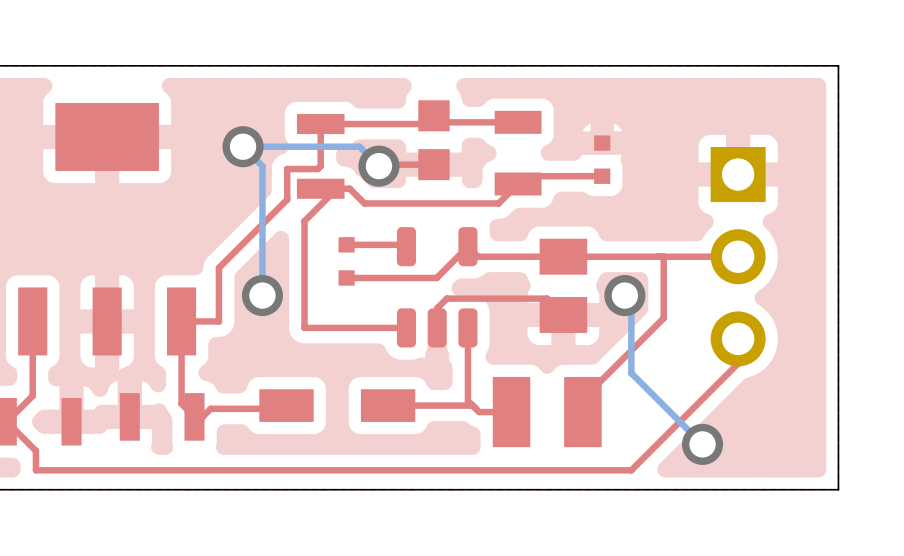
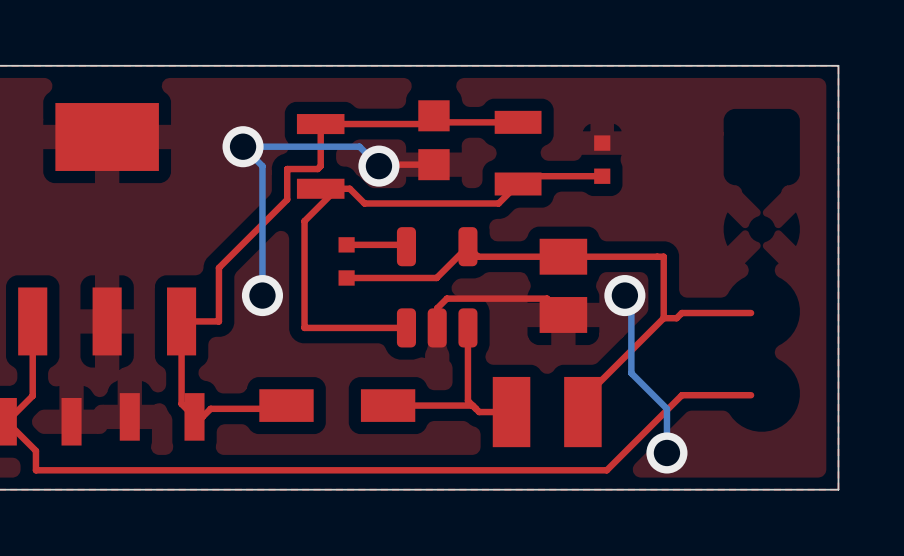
top track: (728, 247) (738, 256) (663, 256) -> none
part: (738, 256) -> none
top track: none -> (751, 313) (681, 313) (676, 318) (663, 318)
top track: (738, 338) (738, 363) (631, 470) (606, 470) -> (751, 395) (681, 395) (606, 470)
bottom track: (666, 408) (702, 444) -> (666, 408) (666, 452)
via position: (702, 444) -> (666, 452)

